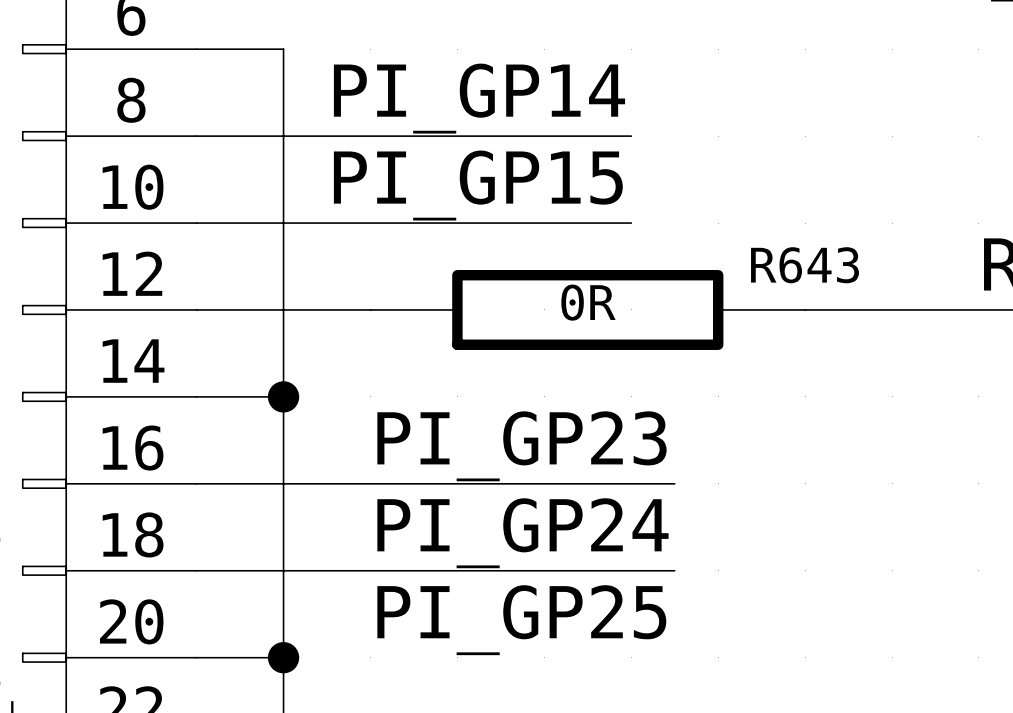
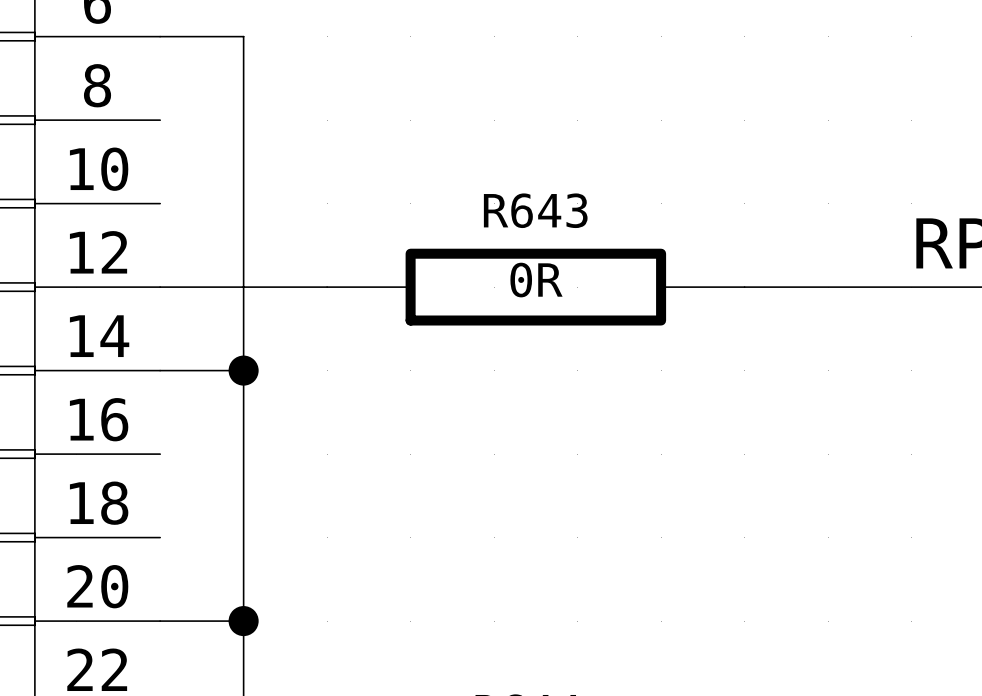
label: PI_GP14 (479, 98) -> none
wire: (196, 136) (631, 136) -> none
label: PI_GP15 (478, 185) -> none
wire: (196, 223) (631, 223) -> none
R643 name position: R643 (805, 265) -> R643 (535, 210)
label: PI_GP23 (521, 446) -> none
wire: (196, 483) (674, 483) -> none
label: PI_GP24 (522, 533) -> none
wire: (196, 570) (674, 570) -> none
label: PI_GP25 (521, 620) -> none

